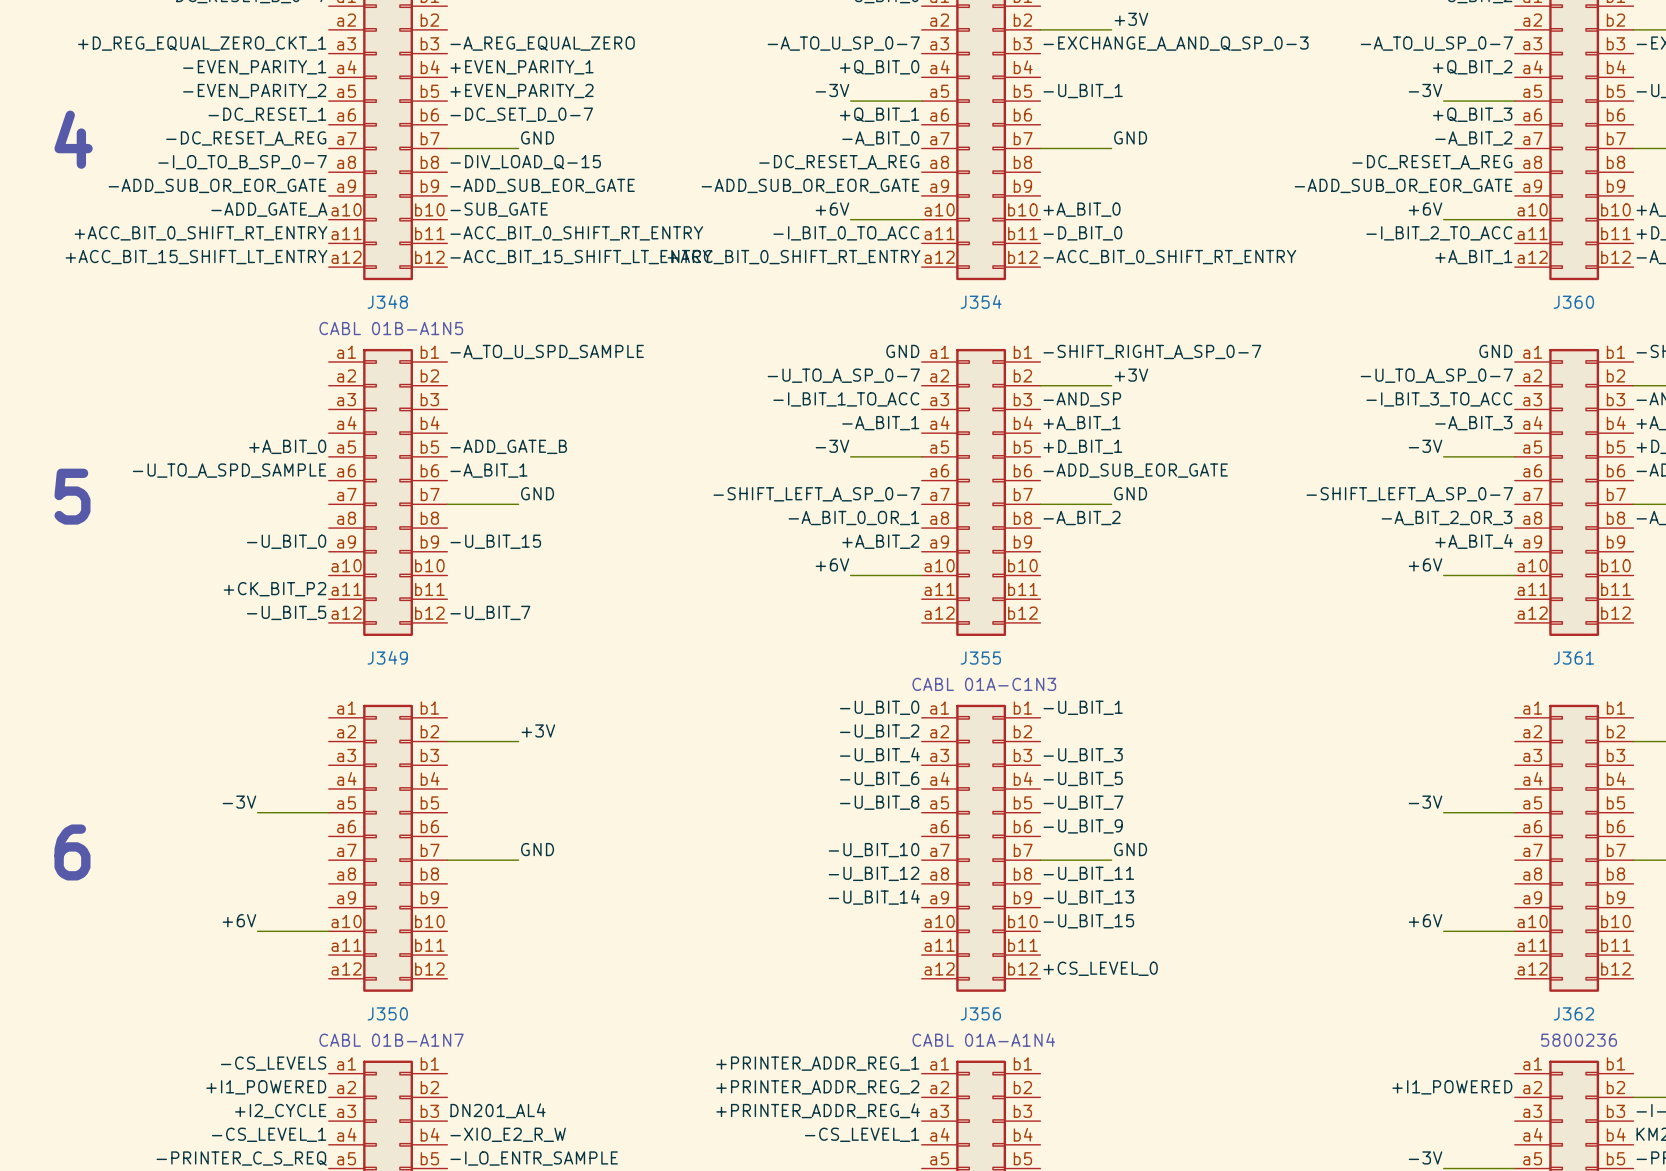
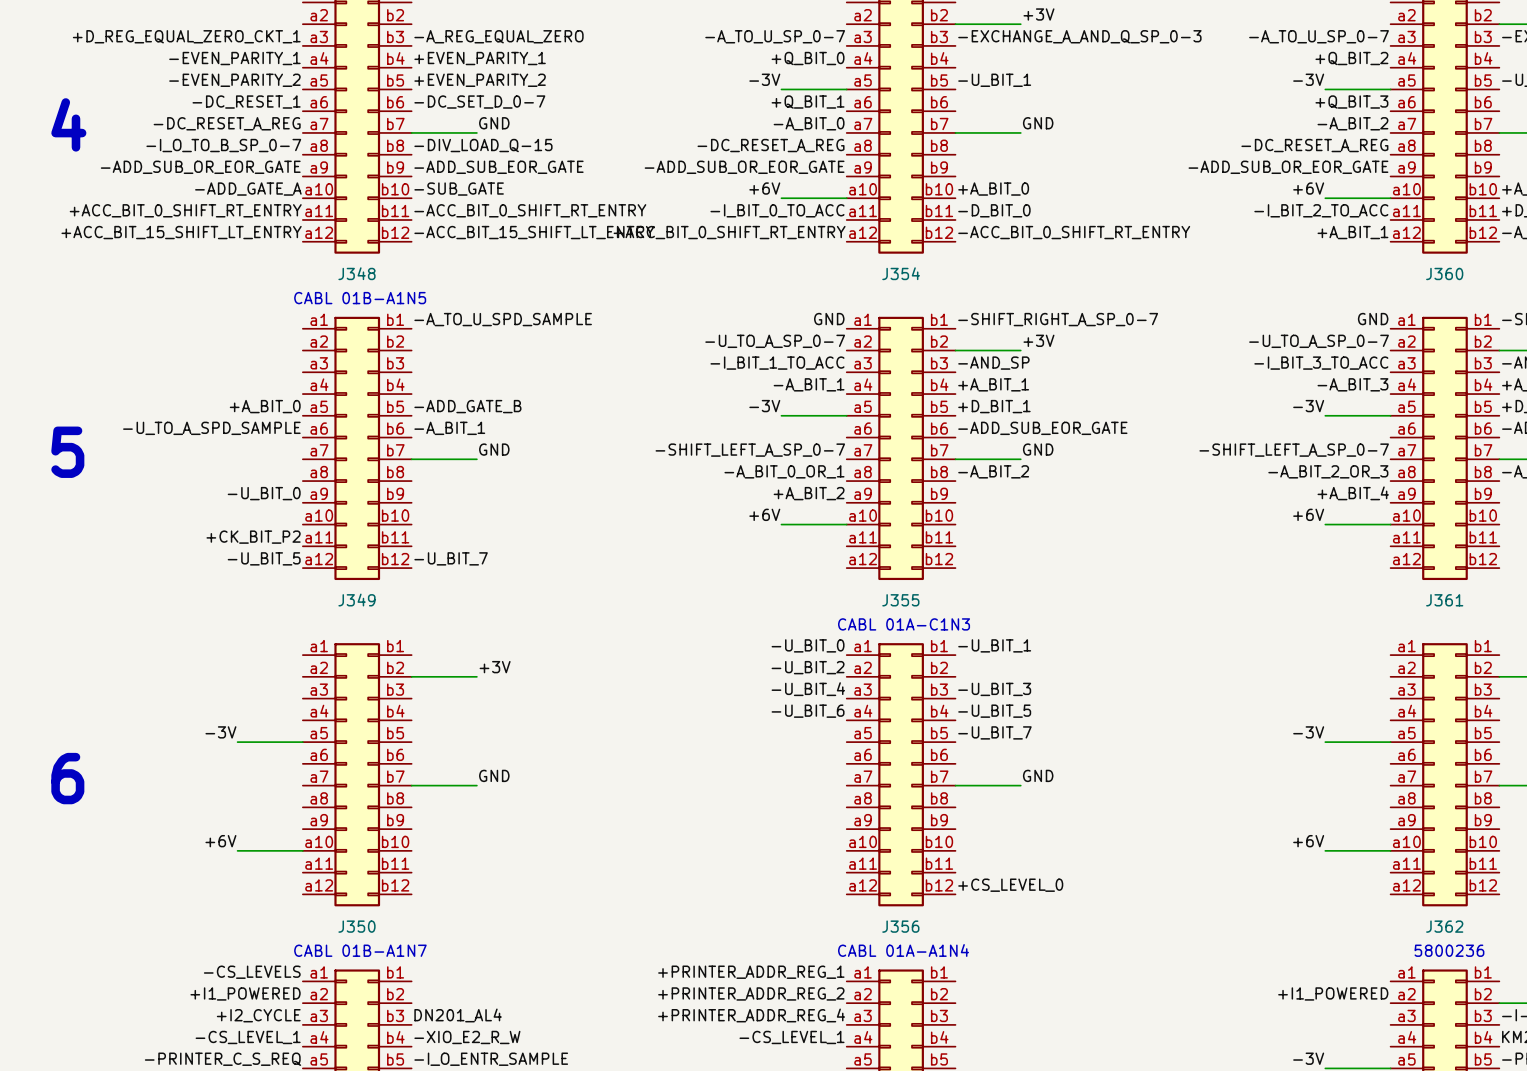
label: -U_BIT_15 (495, 541) -> none
label: -U_BIT_8 (879, 802) -> none
label: -U_BIT_9 (1083, 826) -> none
label: -U_BIT_10 (873, 850) -> none
label: -U_BIT_12 (873, 873) -> none
label: -U_BIT_11 (1088, 873) -> none
label: -U_BIT_14 (874, 897) -> none
label: -U_BIT_13 (1088, 897) -> none
label: -U_BIT_15 (1088, 921) -> none

